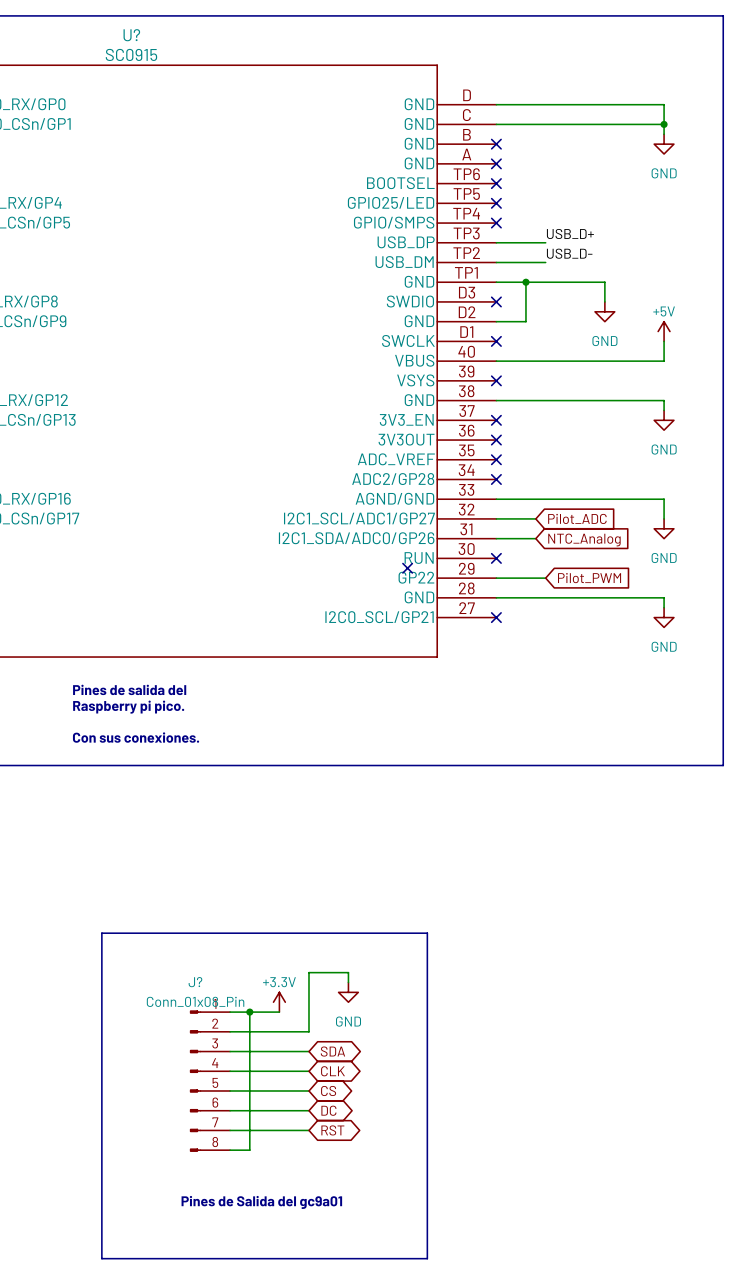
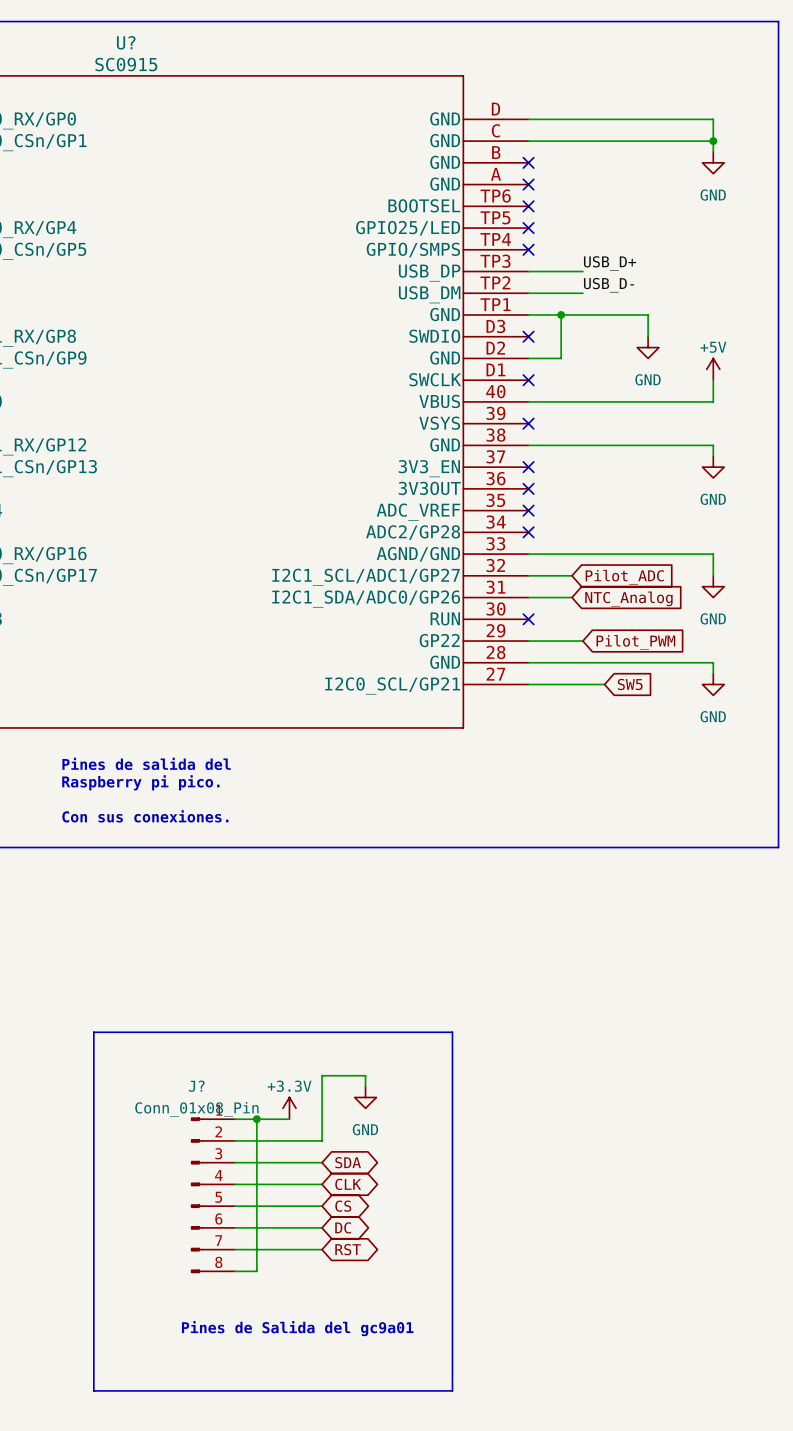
no-connect mark: (407, 568) -> none
wire: none -> (528, 684) (604, 684)
no-connect mark: (496, 617) -> none
global label: none -> SW5 (630, 684)

